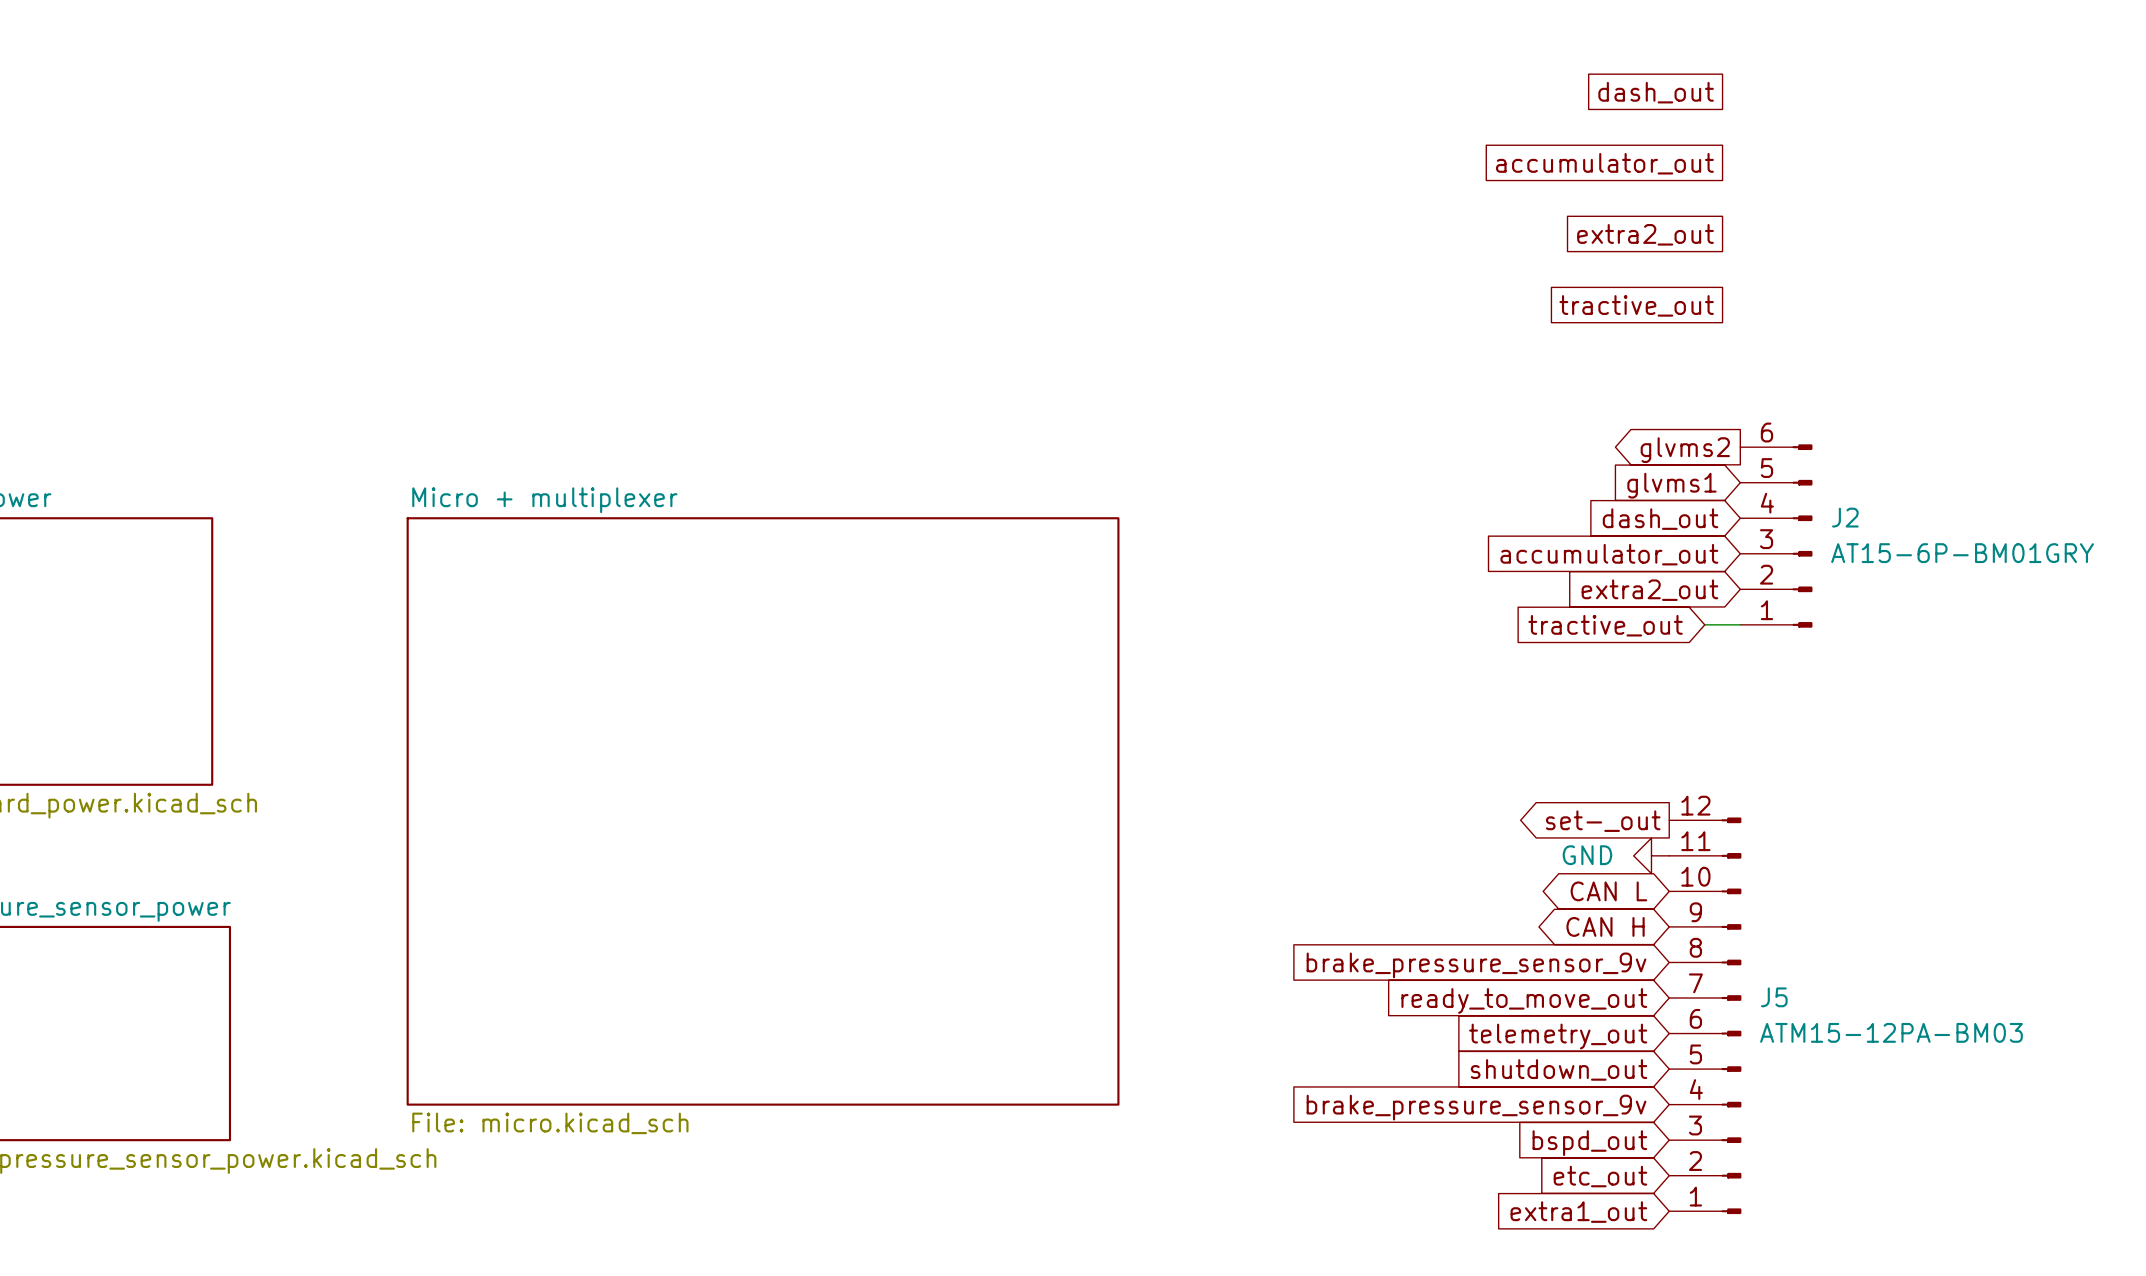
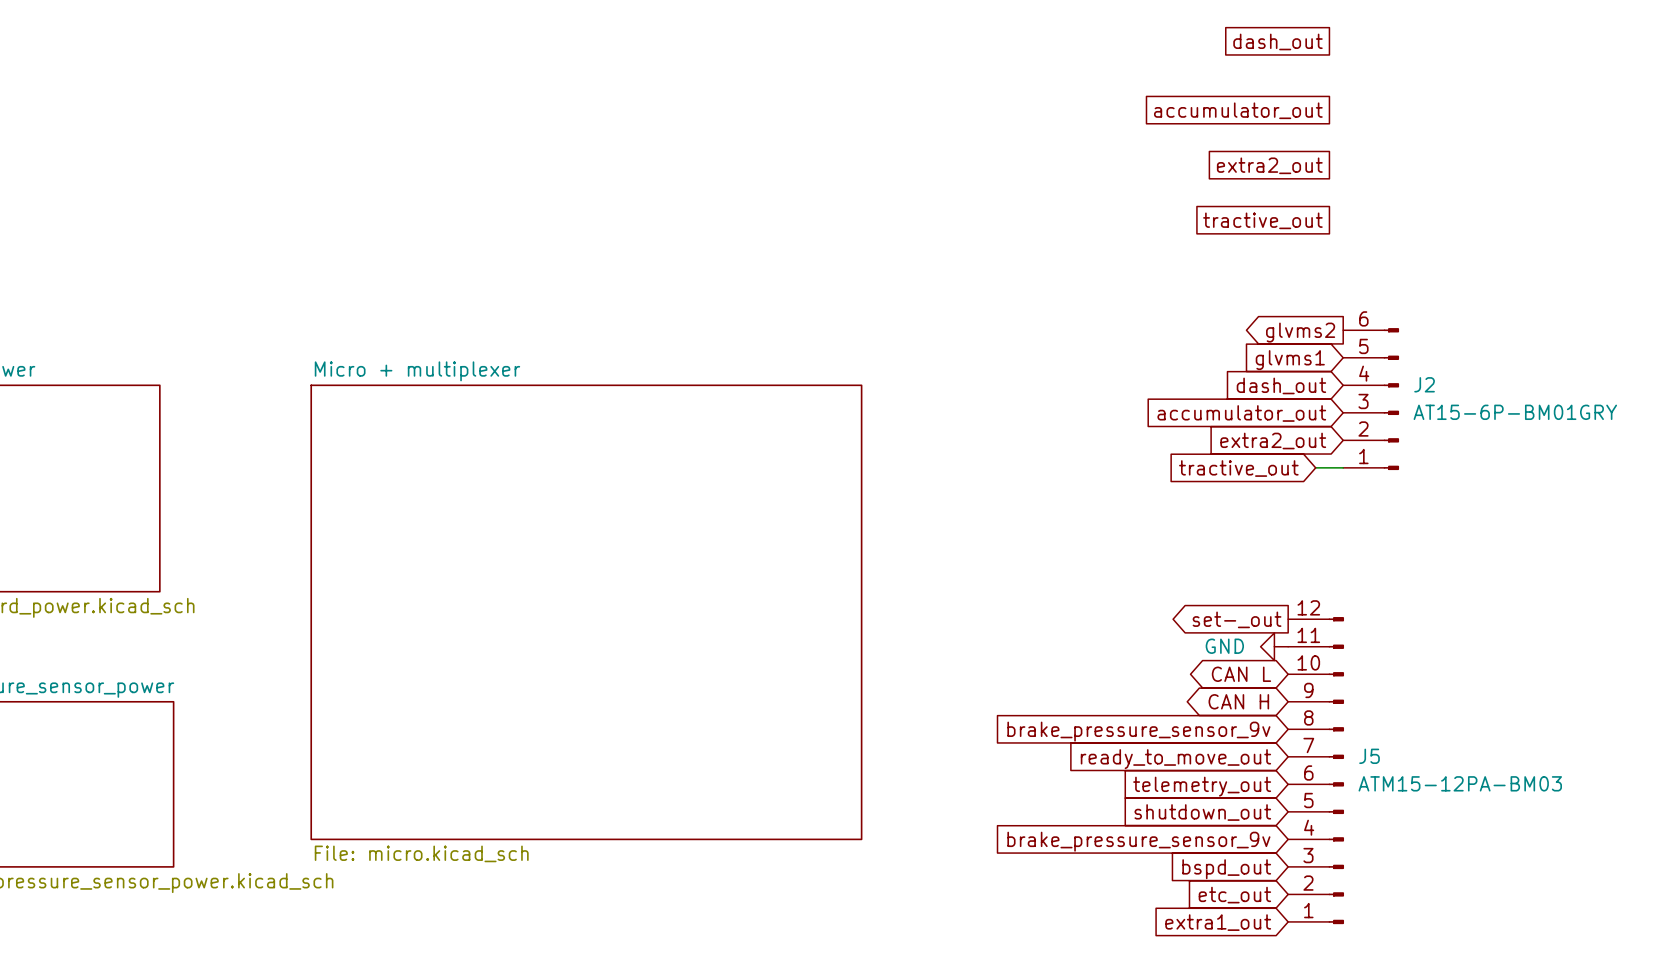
global label position: dash_out (1656, 92) -> dash_out (1277, 41)

